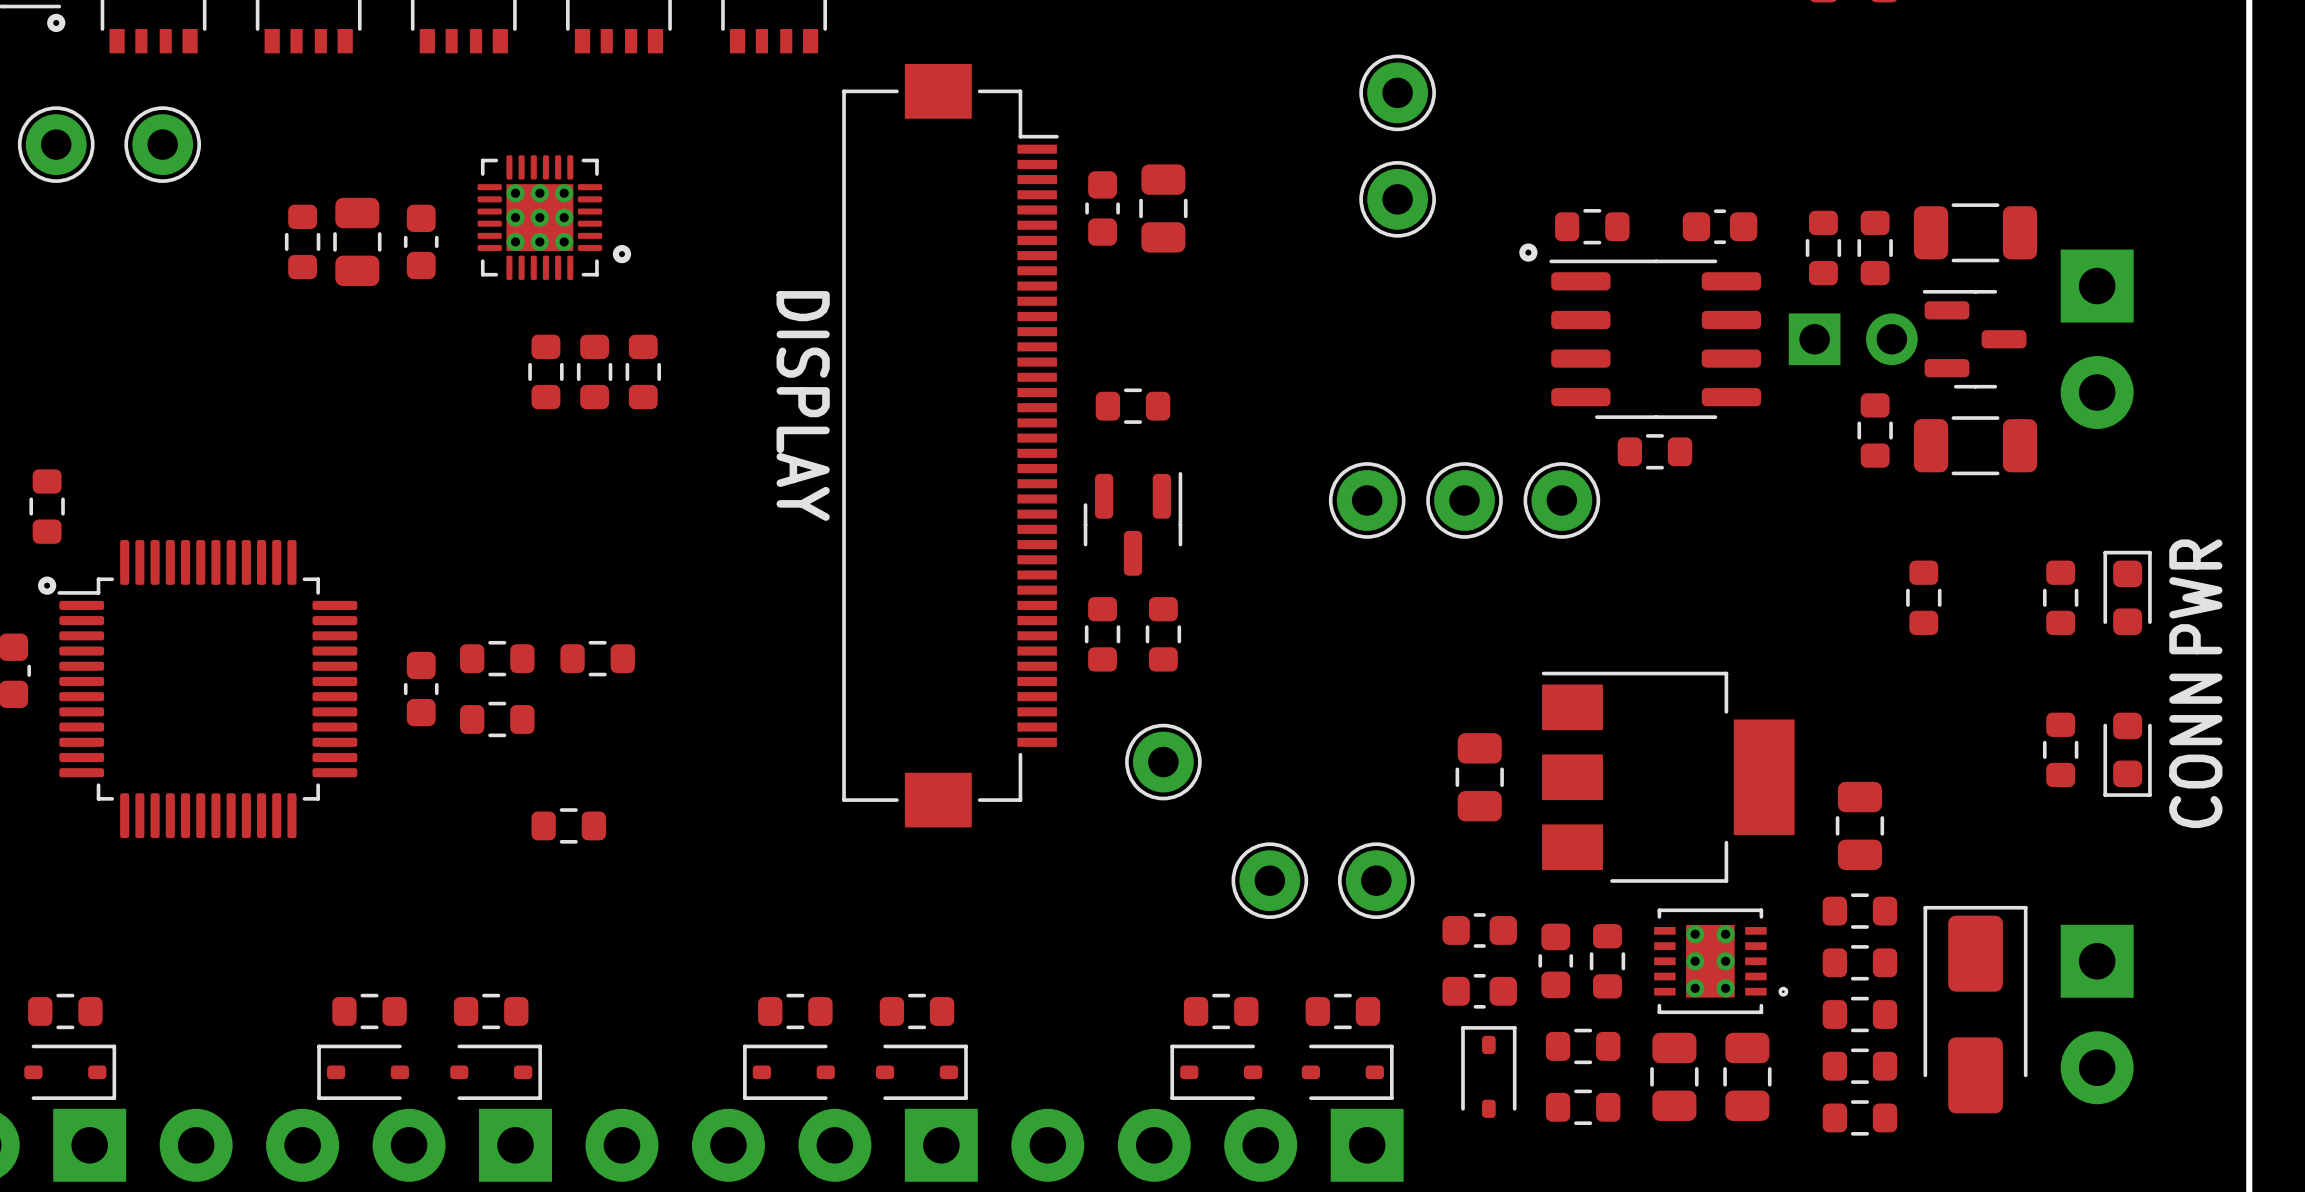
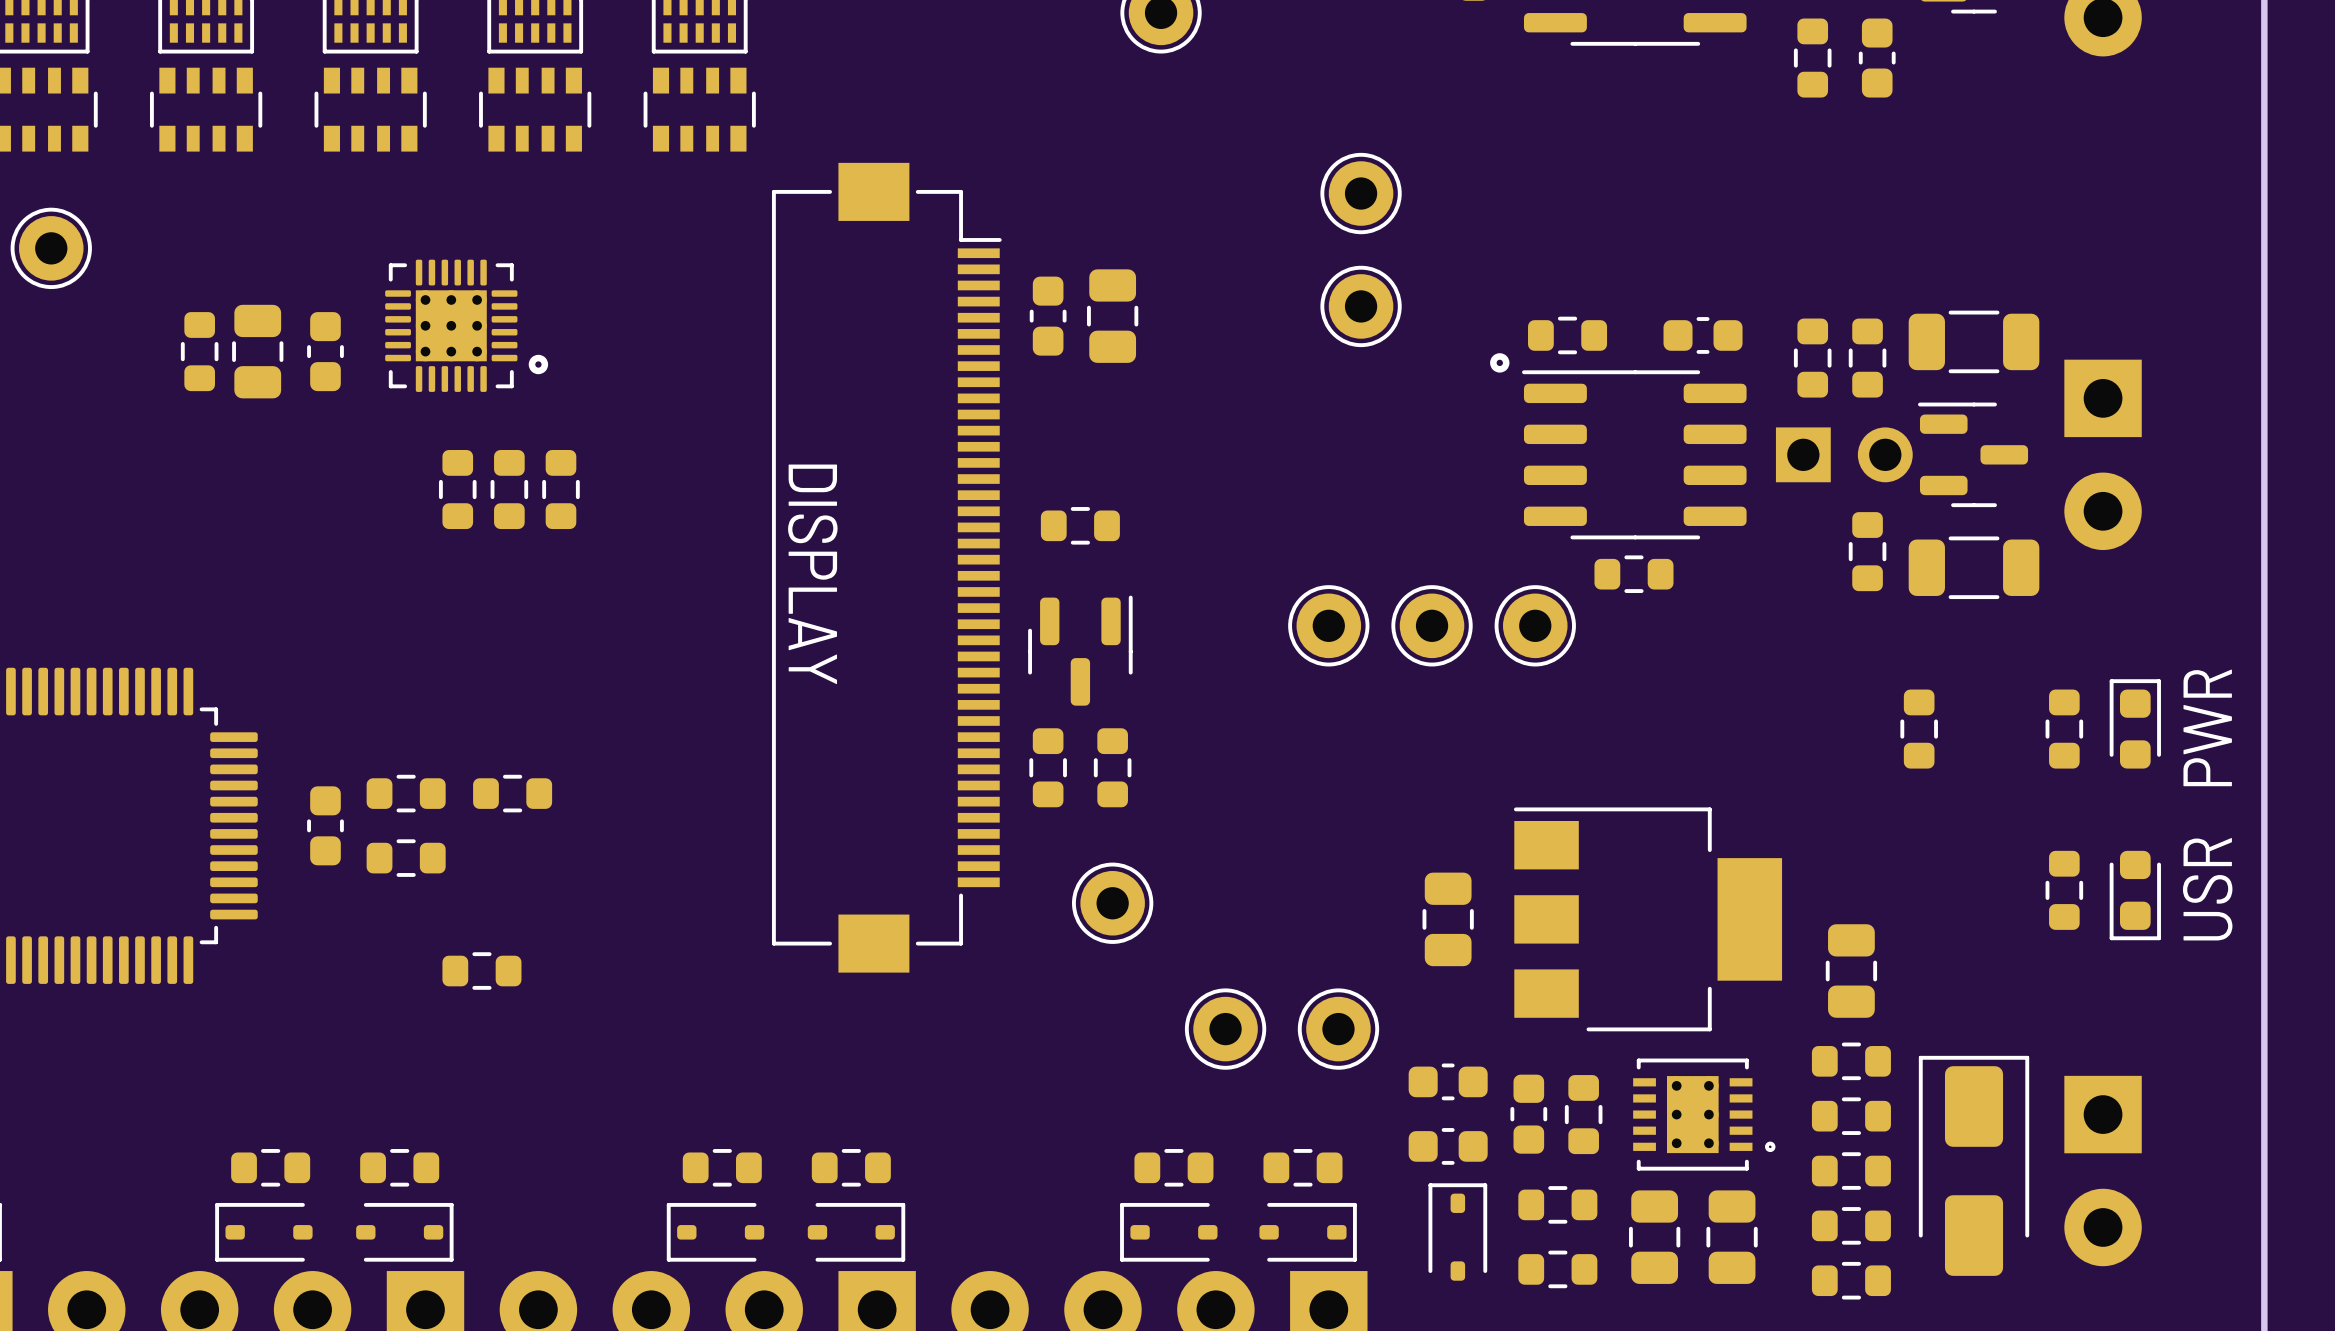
text position: DISPLAY (803, 405) -> DISPLAY (812, 574)
text: CONN (2195, 750) -> USR (2207, 889)

